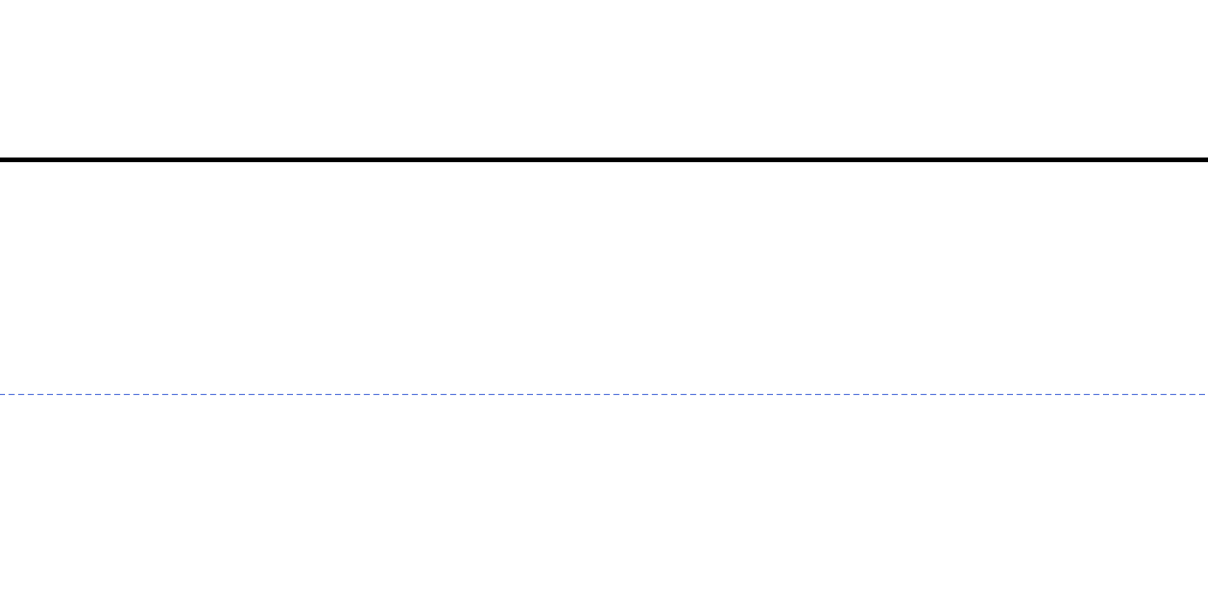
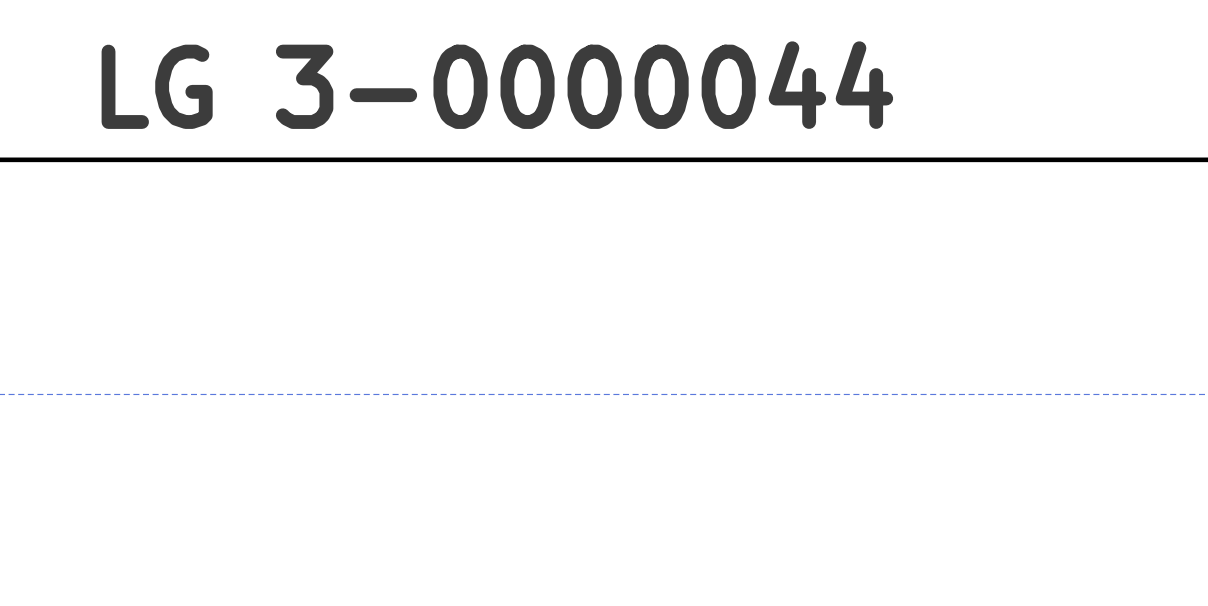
text: none -> LG 3-0000044 (497, 85)

